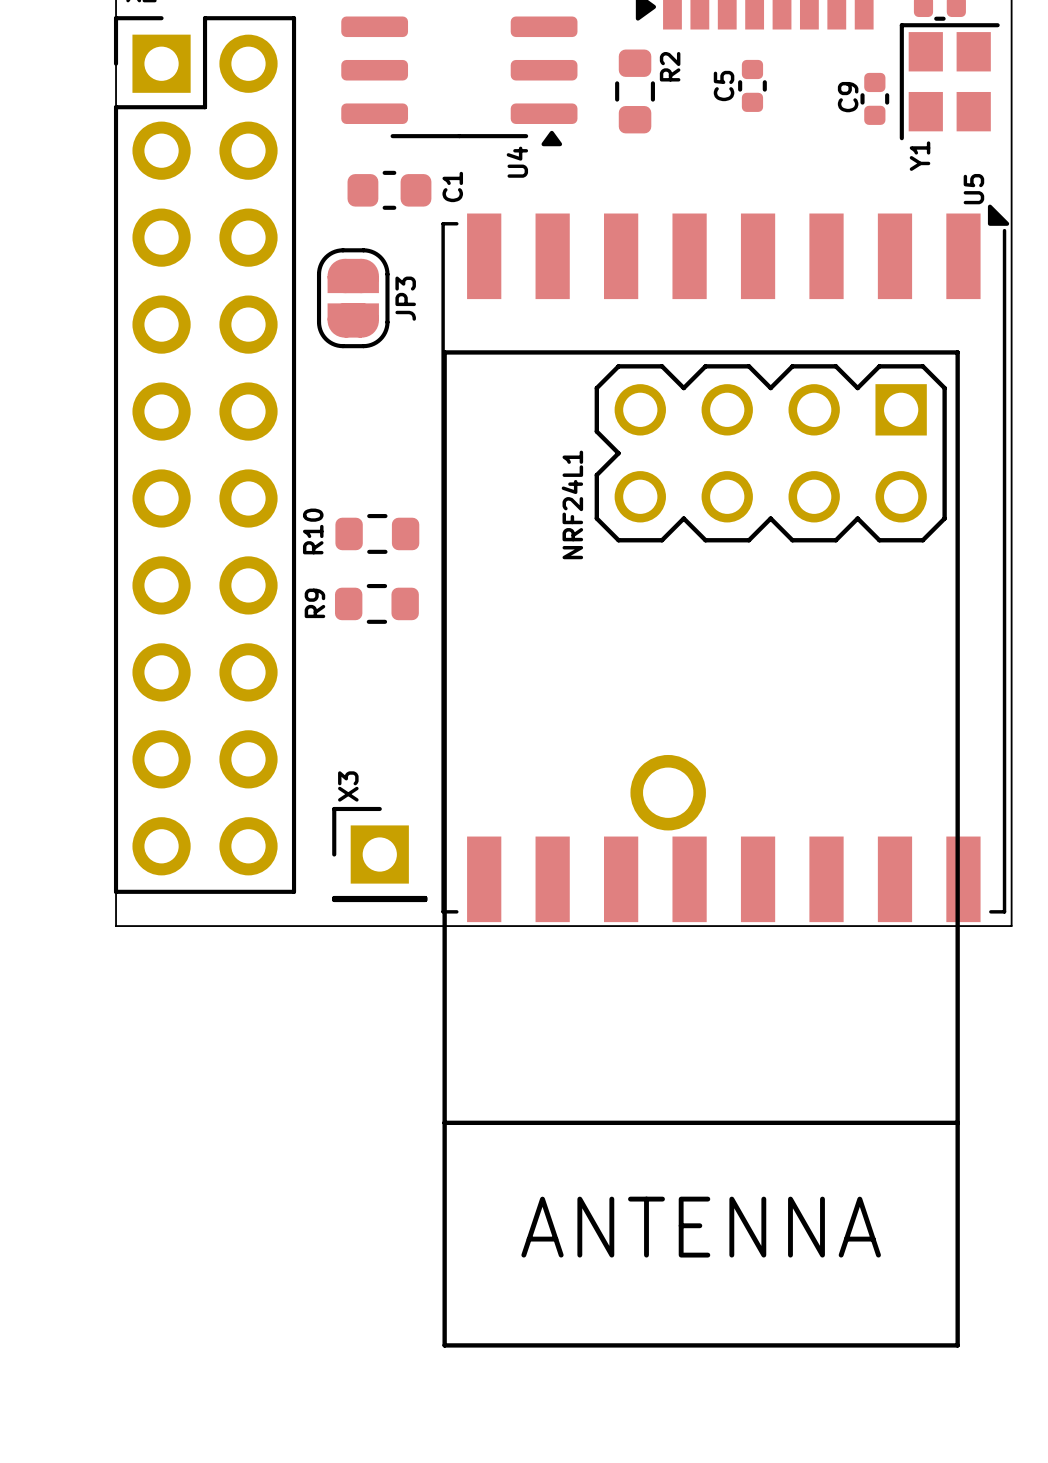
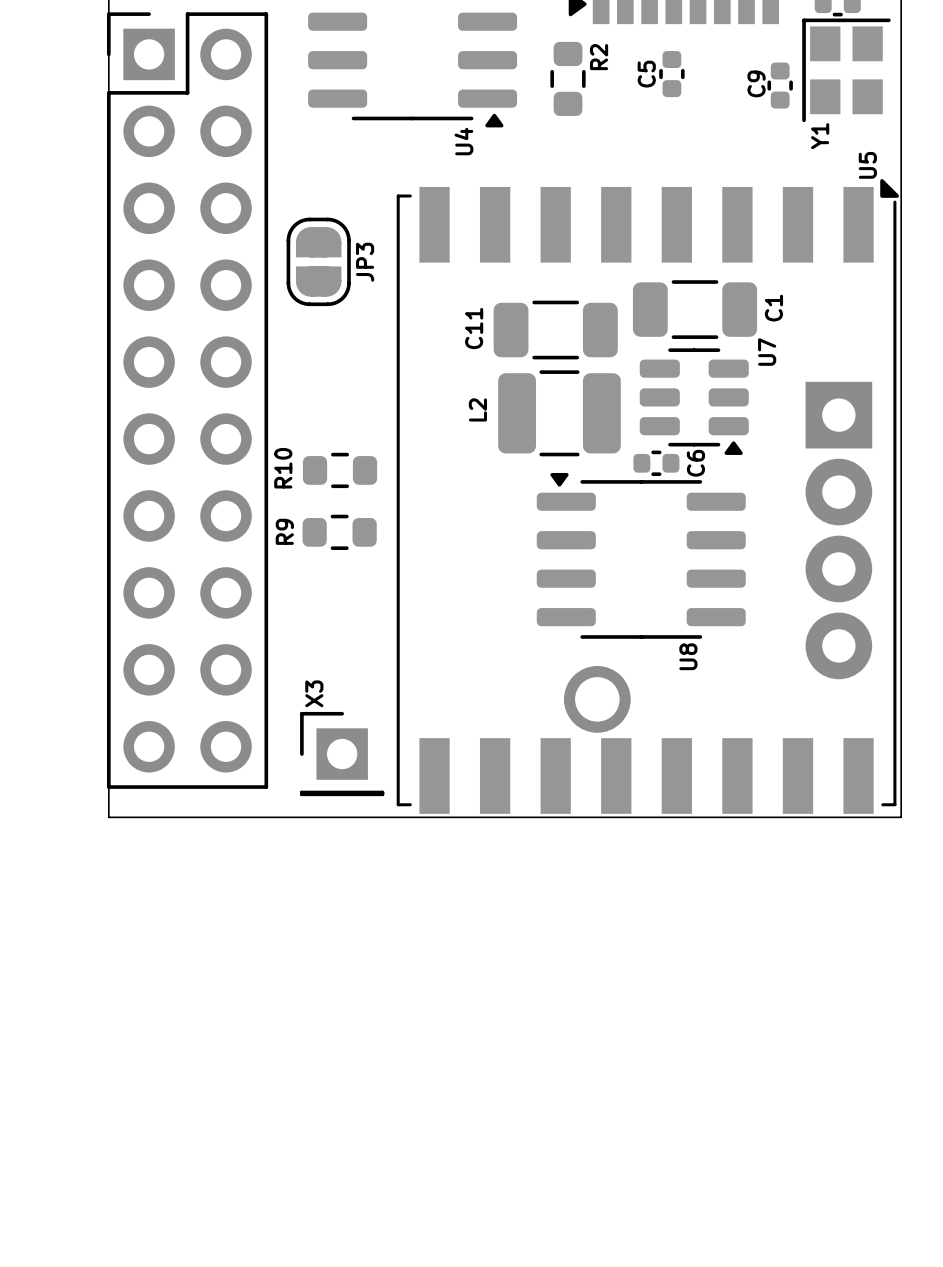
C1 footprint: [347, 170, 432, 210] -> [632, 280, 758, 339]
C11: none -> (555, 330)
U7: none -> (694, 401)
L2: none -> (559, 413)
C6: none -> (656, 463)
part: none -> (838, 530)
U8: none -> (641, 555)
NRF24L1: (701, 848) -> none

